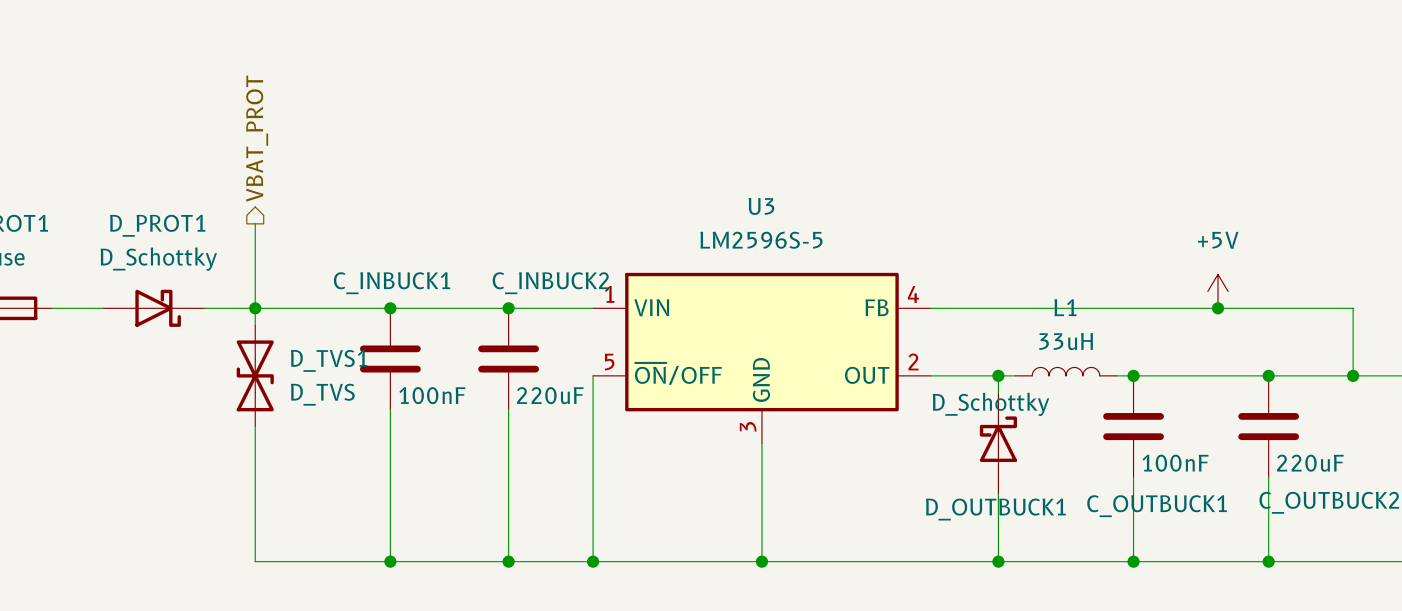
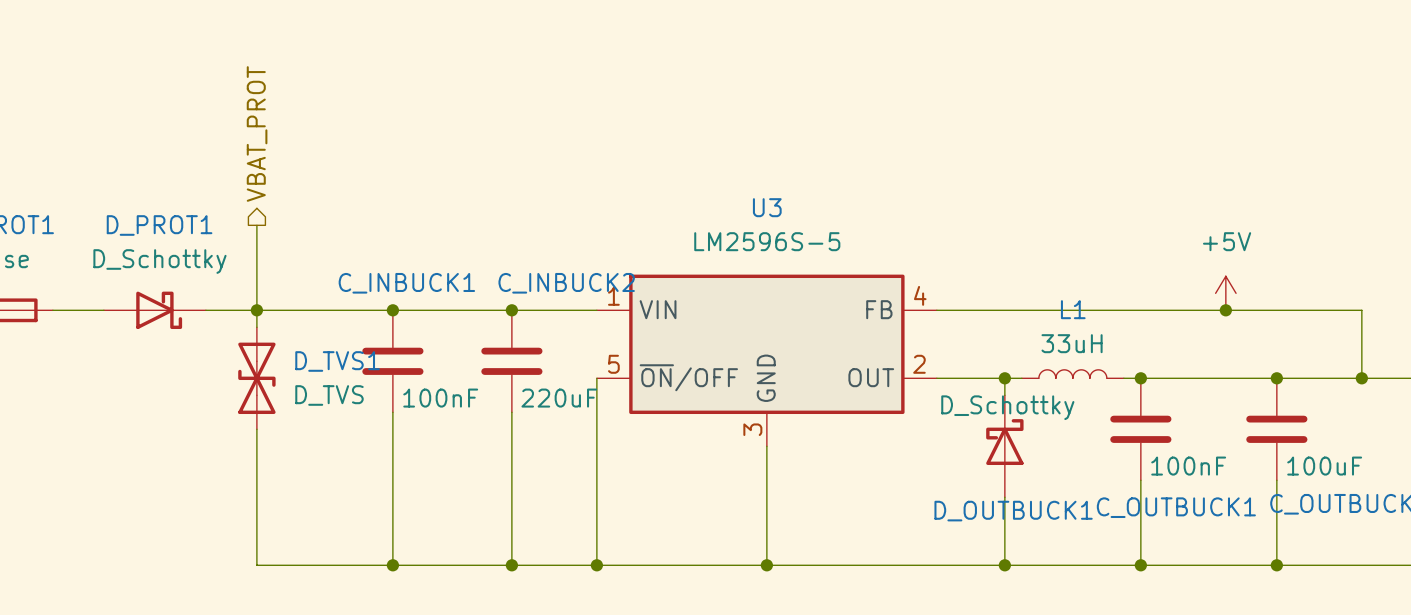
C_OUTBUCK2 value: 220uF (1310, 463) -> 100uF (1324, 466)

